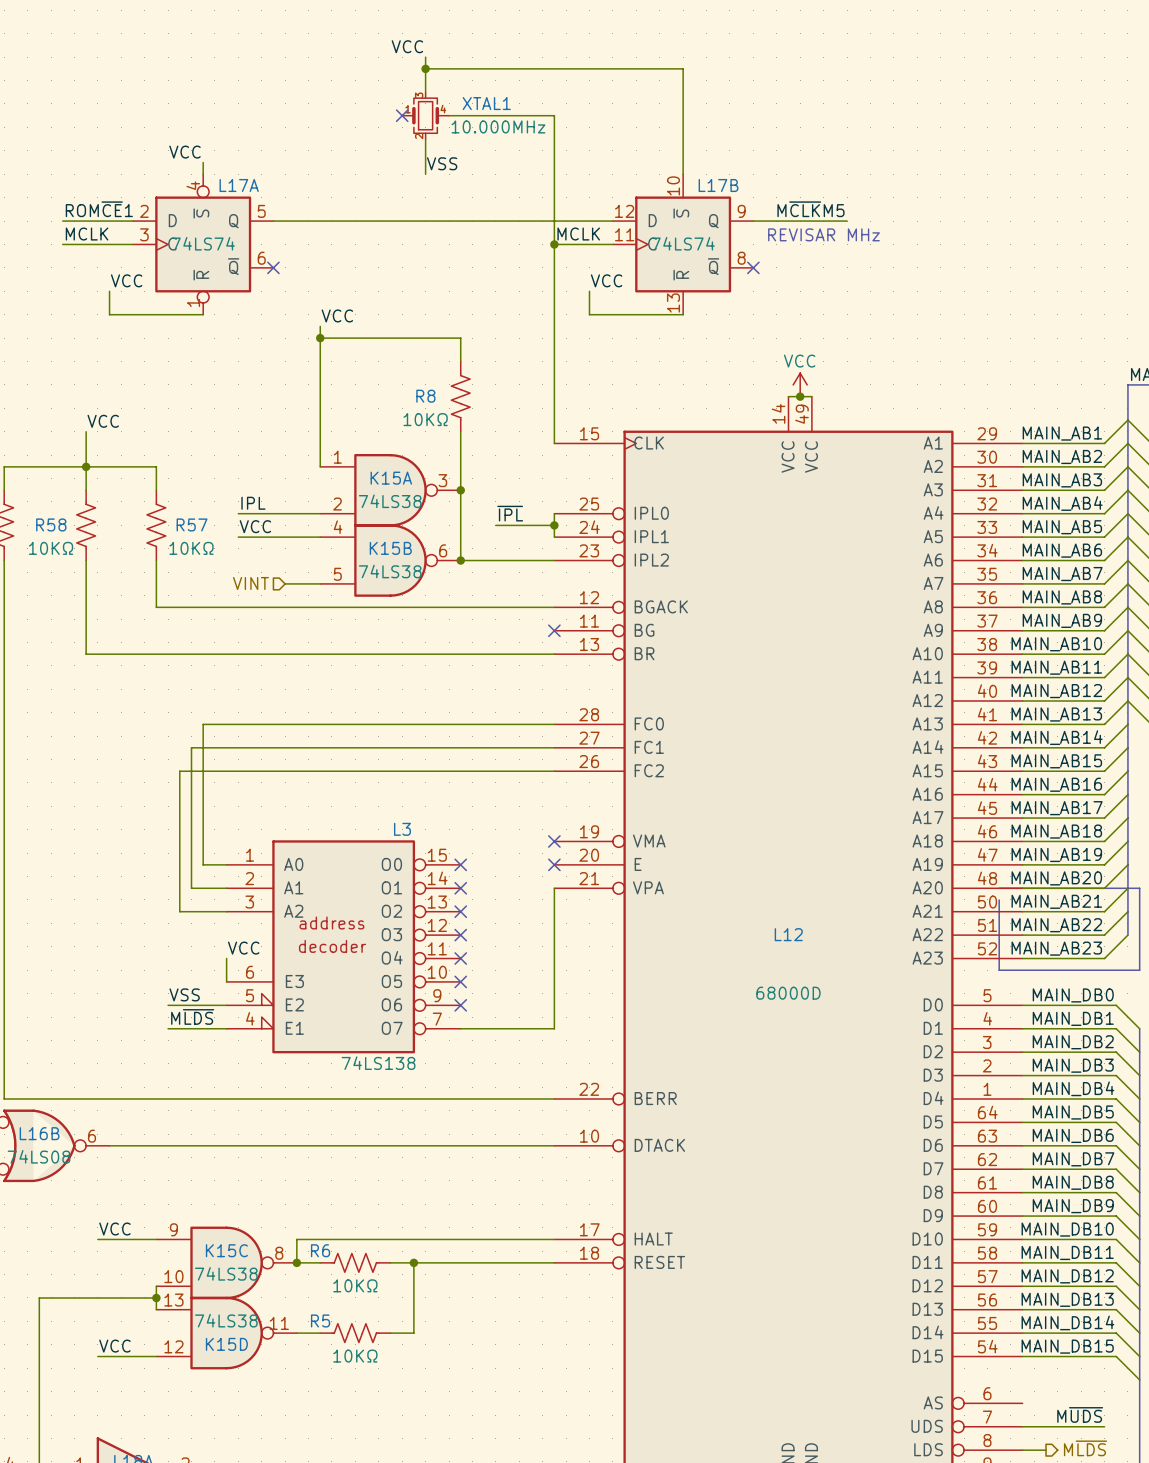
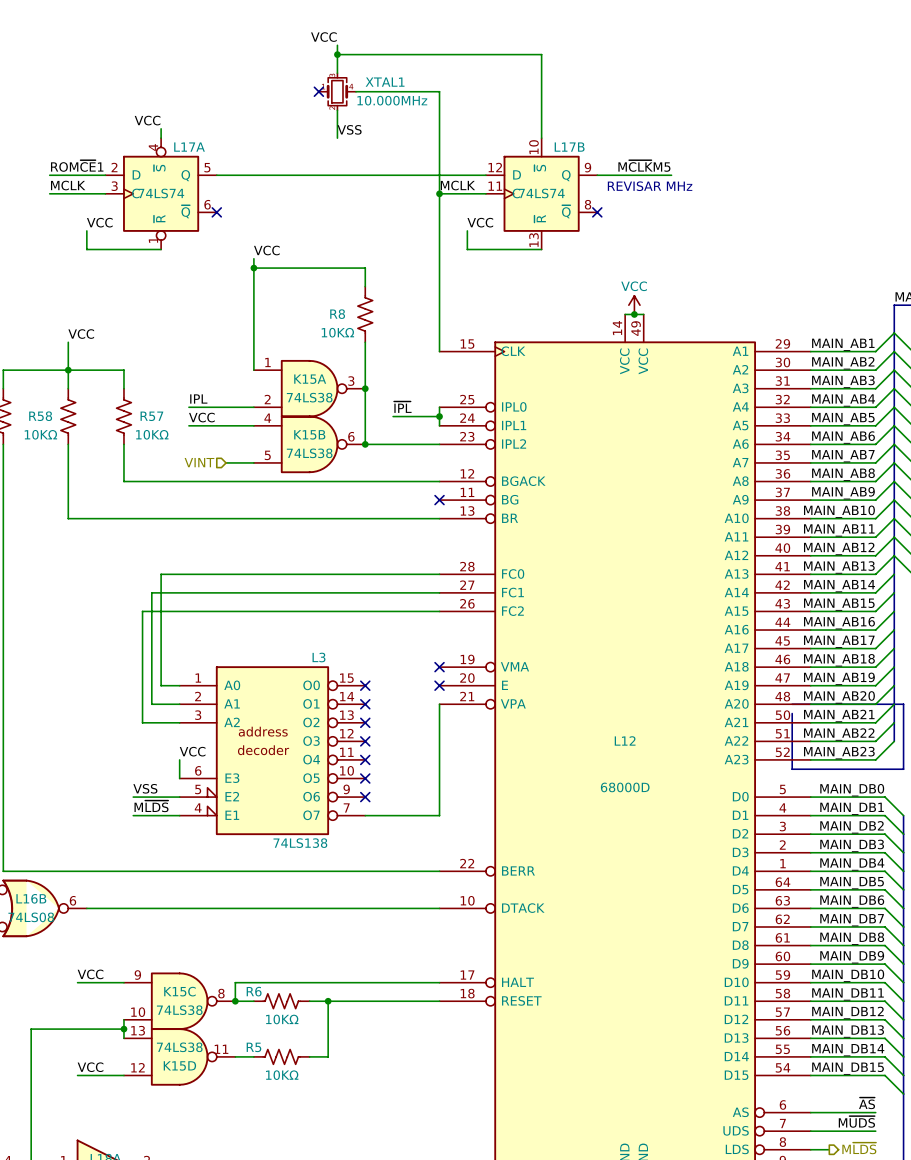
label: none -> ~{AS} (867, 1103)
wire: none -> (810, 1112) (875, 1112)

